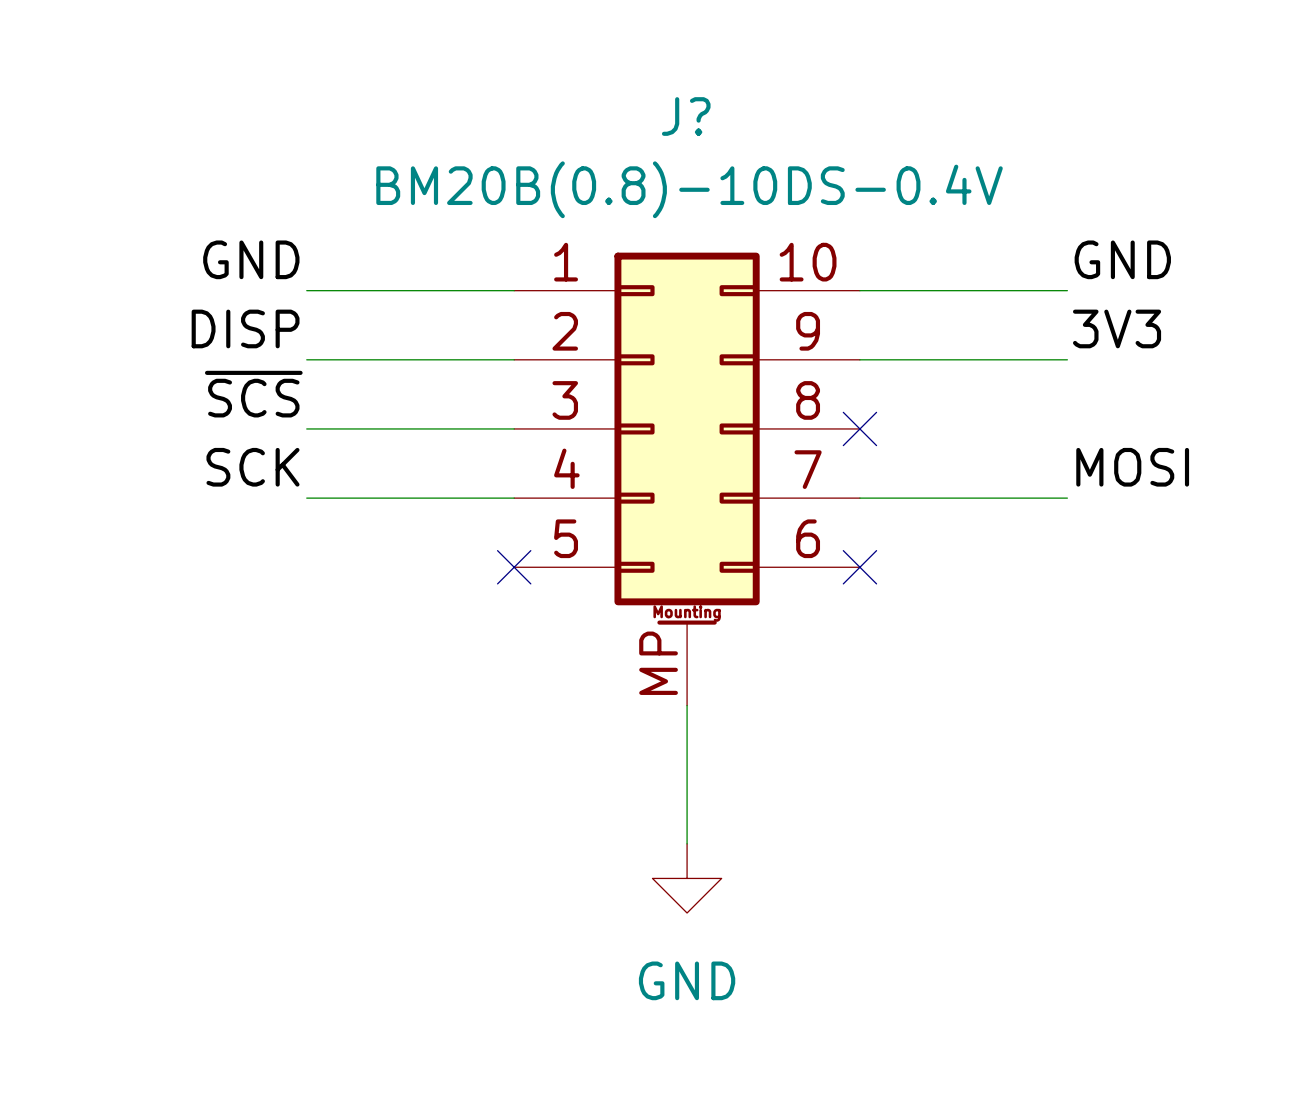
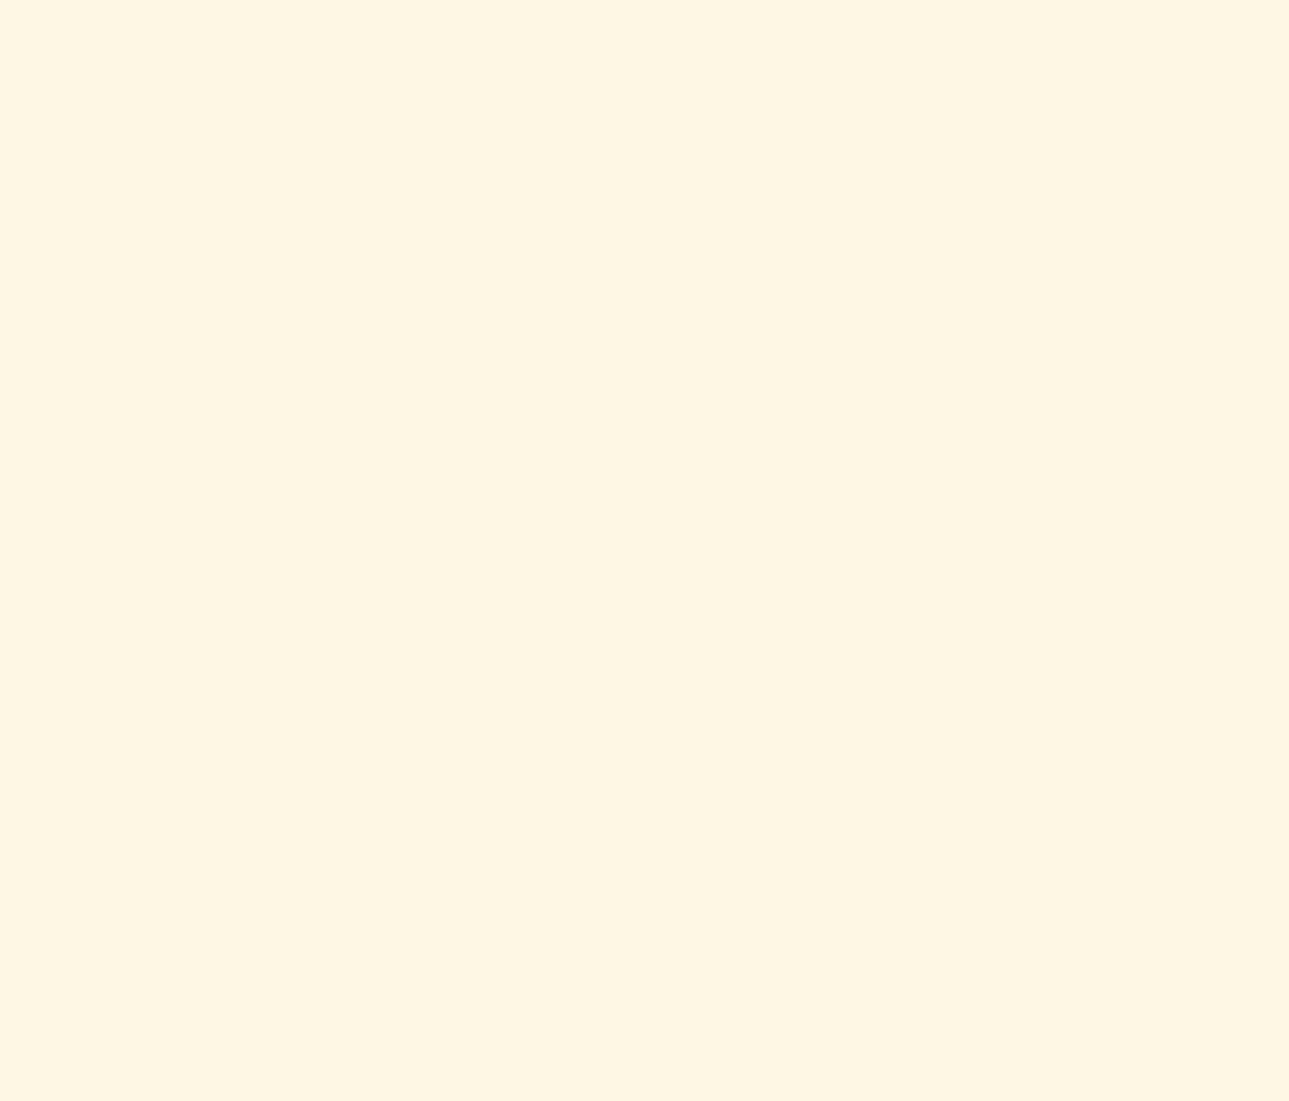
label: GND (251, 259) -> none
label: GND (1122, 259) -> none
wire: (306, 290) (514, 290) -> none
wire: (859, 290) (1067, 290) -> none
label: DISP (245, 328) -> none
label: 3V3 (1117, 328) -> none
wire: (306, 359) (514, 359) -> none
wire: (859, 359) (1067, 359) -> none
label: ~{SCS} (253, 394) -> none
wire: (306, 428) (514, 428) -> none
no-connect mark: (859, 428) -> none
label: SCK (252, 467) -> none
label: MOSI (1132, 467) -> none
J?: BM20B(0.8)-10DS-0.4V (687, 479) -> none
wire: (306, 498) (514, 498) -> none
wire: (859, 498) (1067, 498) -> none
no-connect mark: (514, 567) -> none
no-connect mark: (859, 567) -> none
wire: (687, 705) (687, 843) -> none
power symbol: GND (687, 878) -> none

